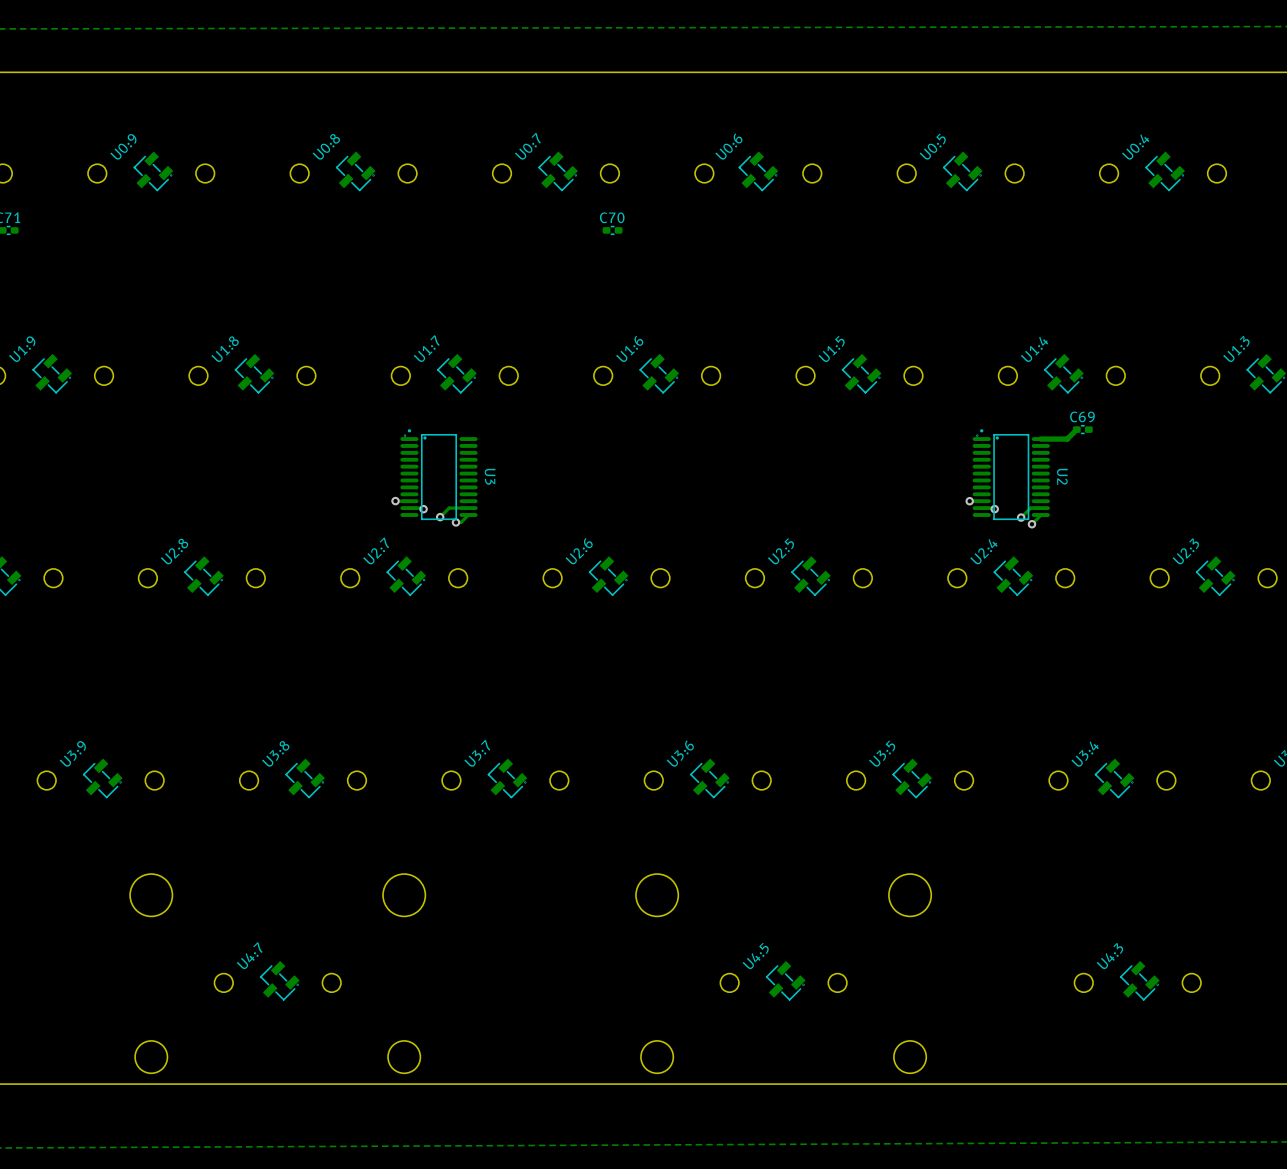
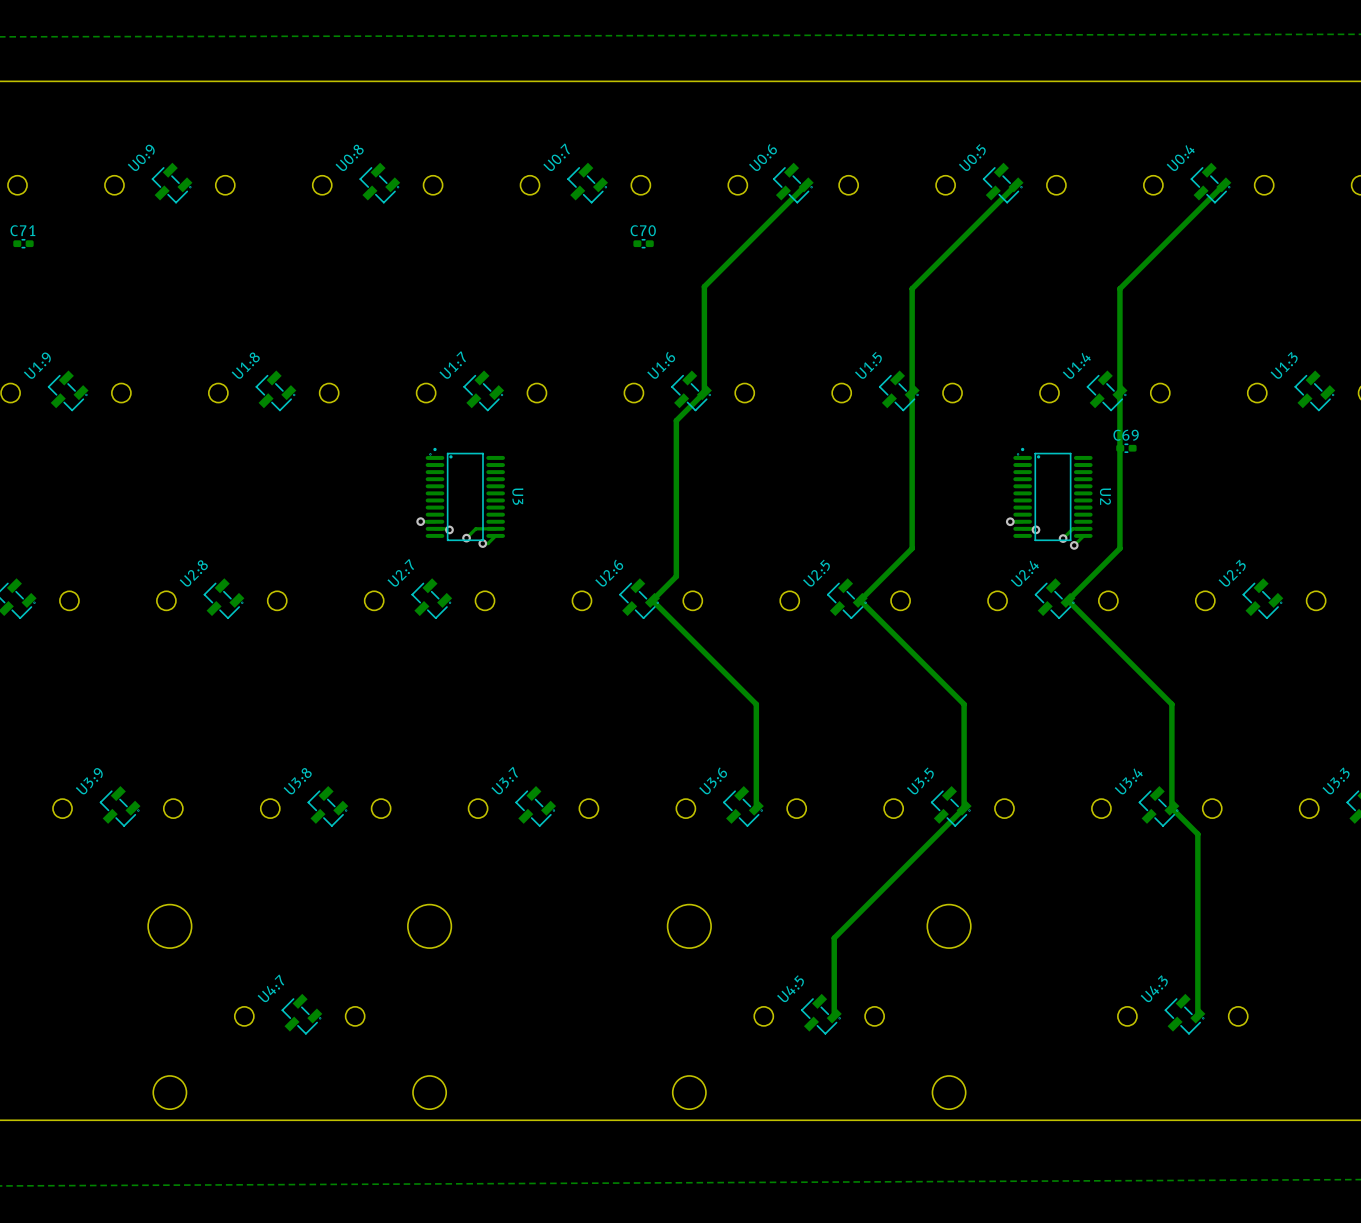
track: none -> (806, 184) (704, 286) (704, 392) (676, 420) (676, 576) (652, 600) (756, 704) (756, 808)
track: none -> (1016, 184) (912, 288) (912, 548) (860, 600) (964, 704) (964, 808) (834, 938) (834, 1016)
track: none -> (1223, 184) (1119, 288) (1119, 548) (1067, 600) (1171, 704) (1171, 808) (1197, 834) (1197, 1016)
track: (1076, 429) (1067, 439) (1040, 439) -> none

